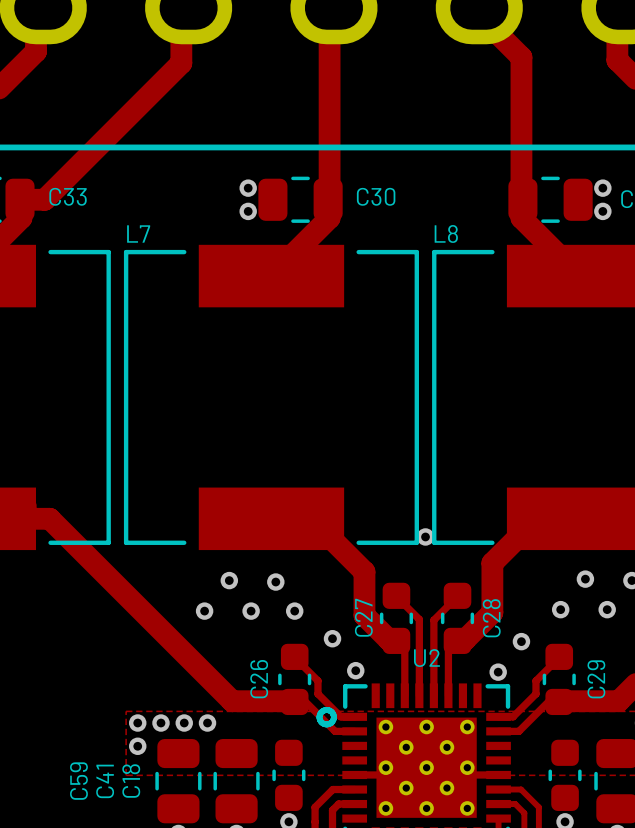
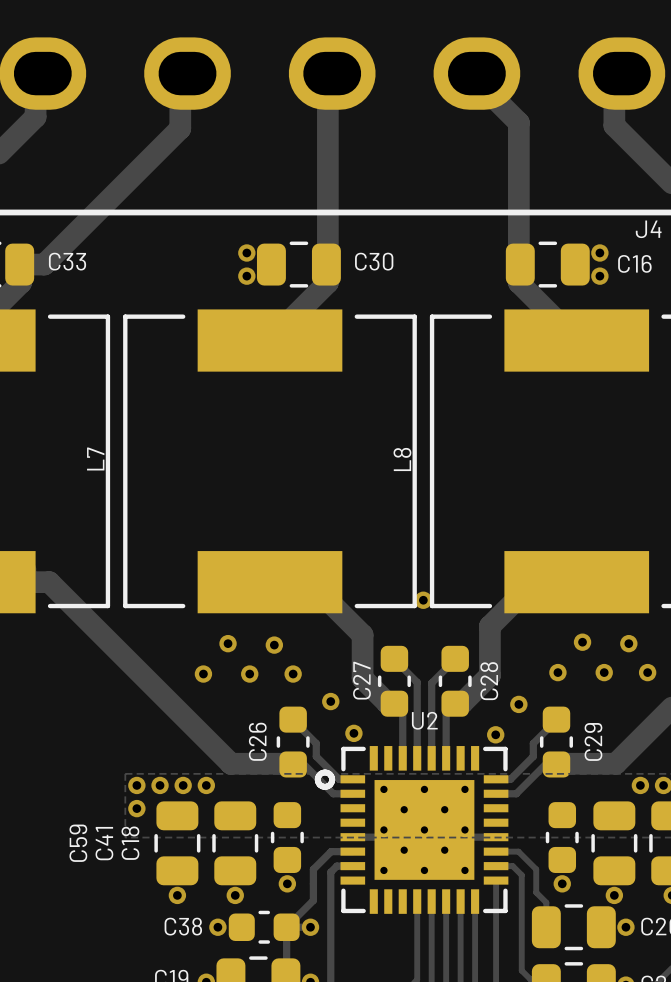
L8 name rotation: 0° (446, 233) -> 90° counterclockwise (402, 459)
L8 name position: L8 (446, 233) -> L8 (402, 459)
L7 name rotation: 0° (138, 234) -> 90° counterclockwise (95, 459)
L7 name position: L7 (138, 234) -> L7 (95, 459)

